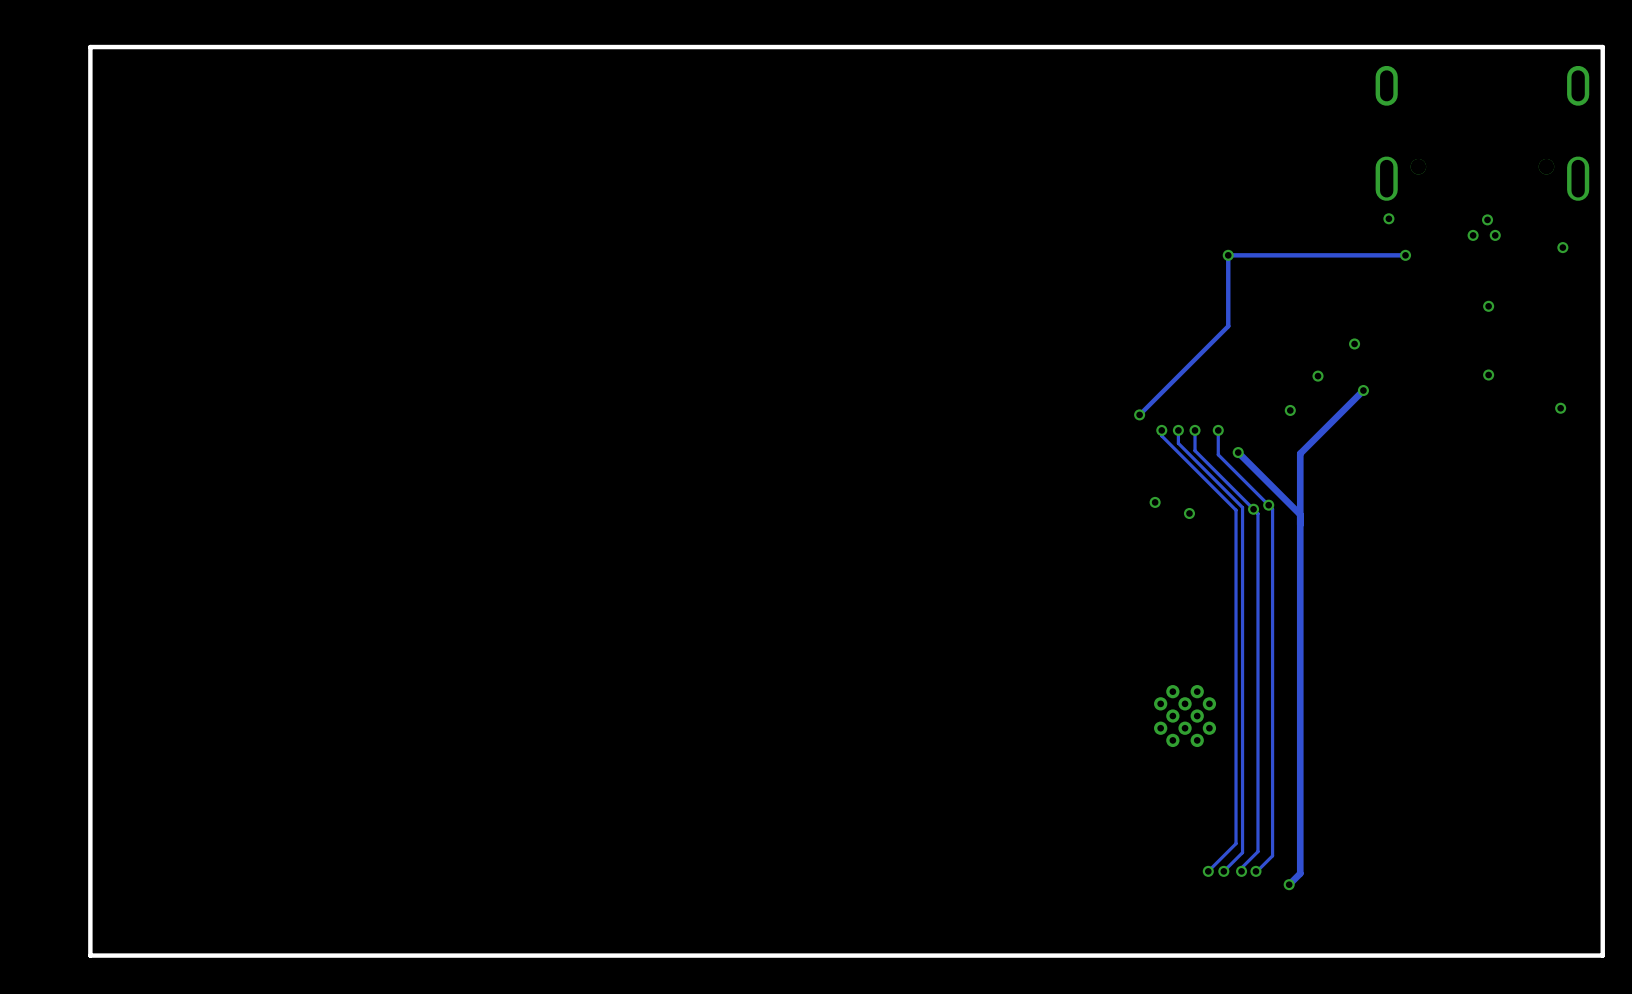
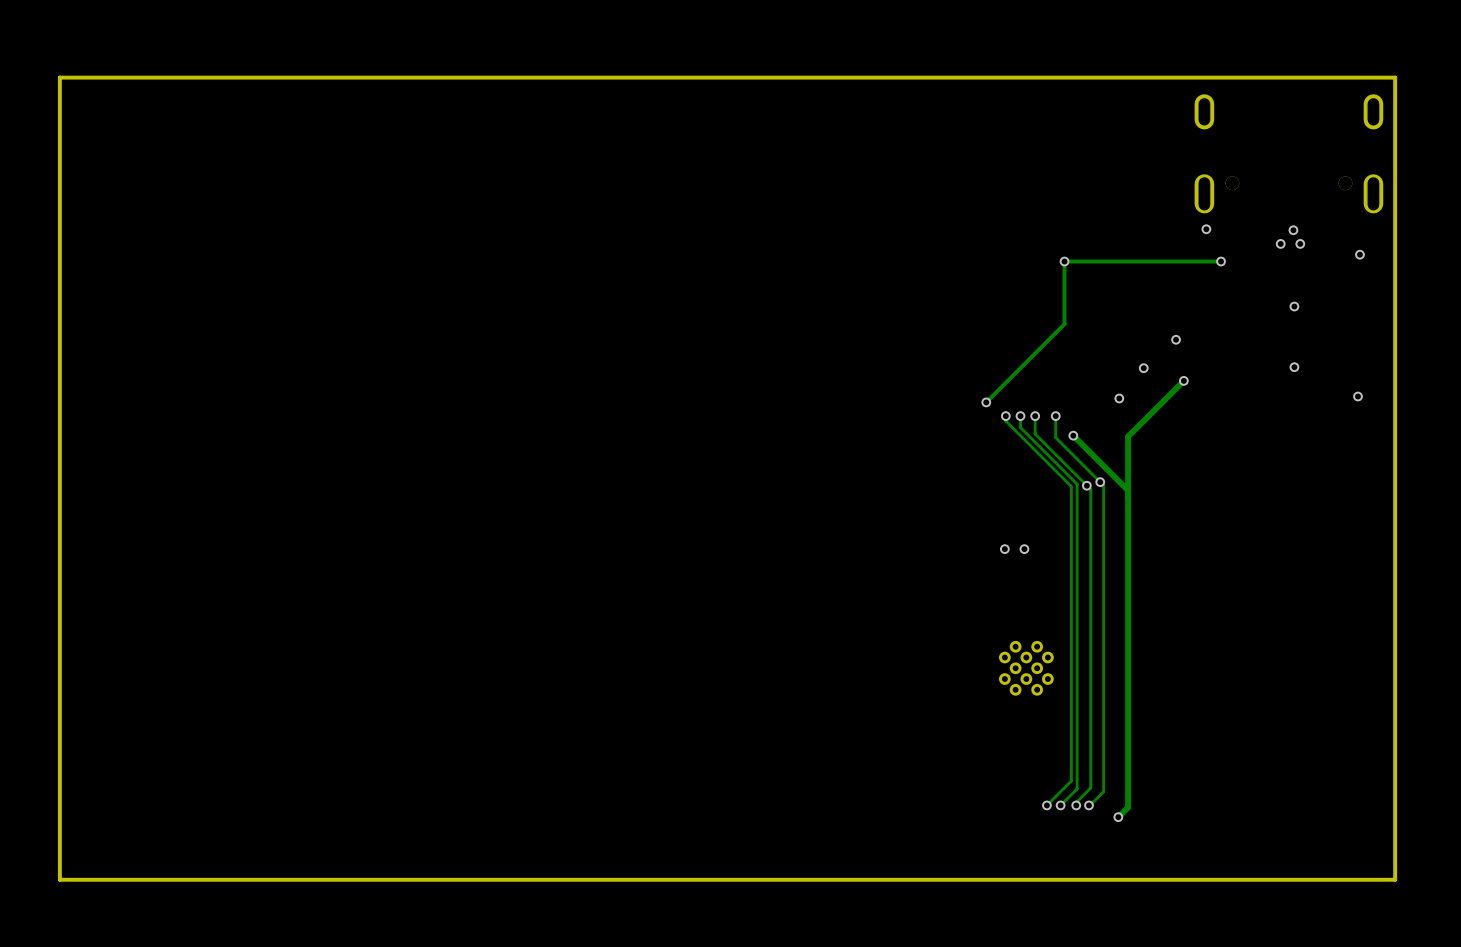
via: (1155, 502) -> none
via: (1189, 513) -> none
via: none -> (1004, 549)
via: none -> (1024, 549)

